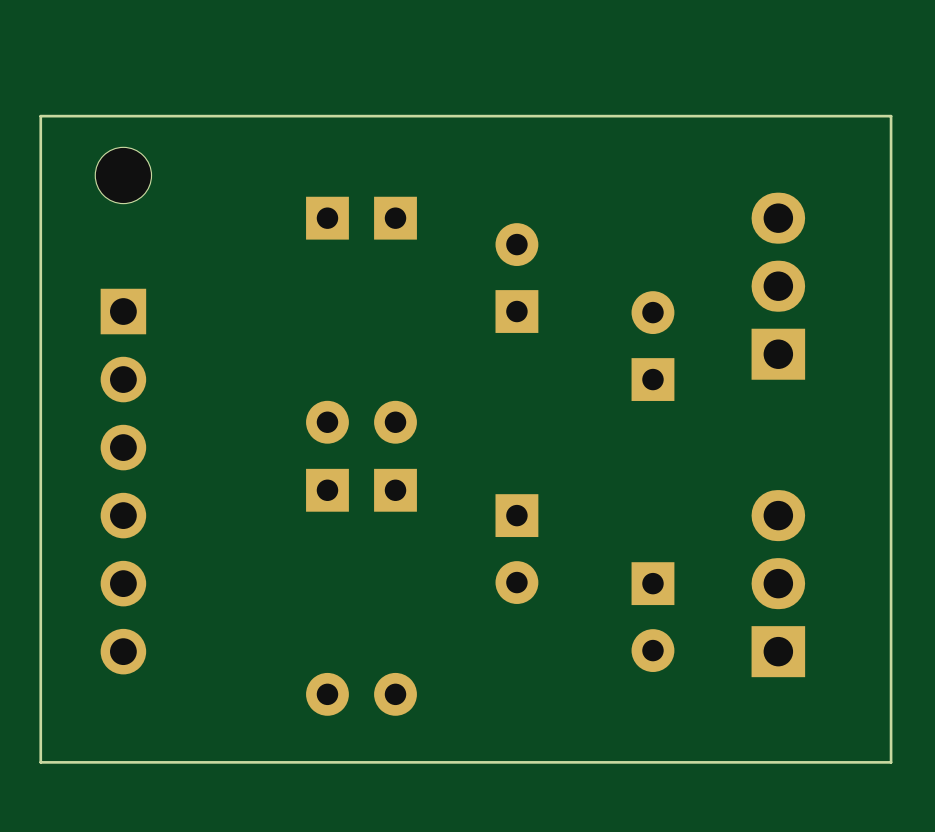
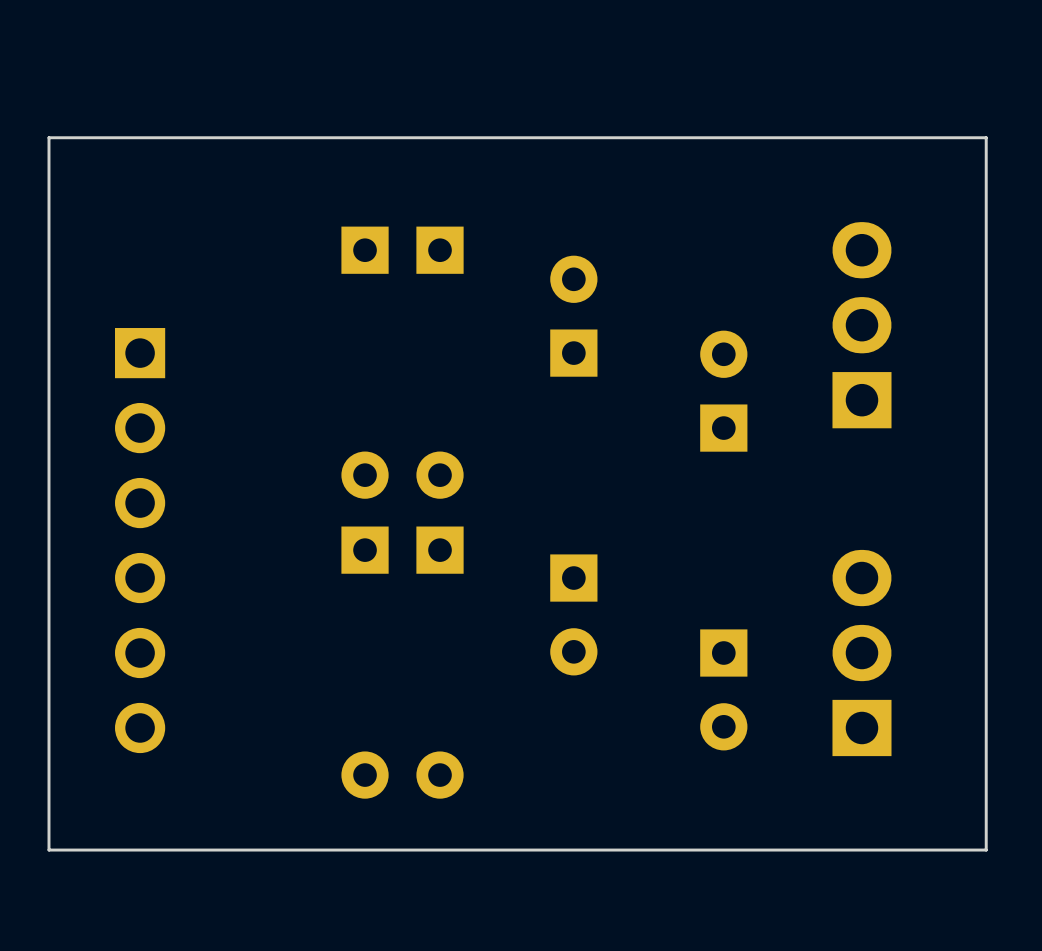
part: (123, 175) -> none

